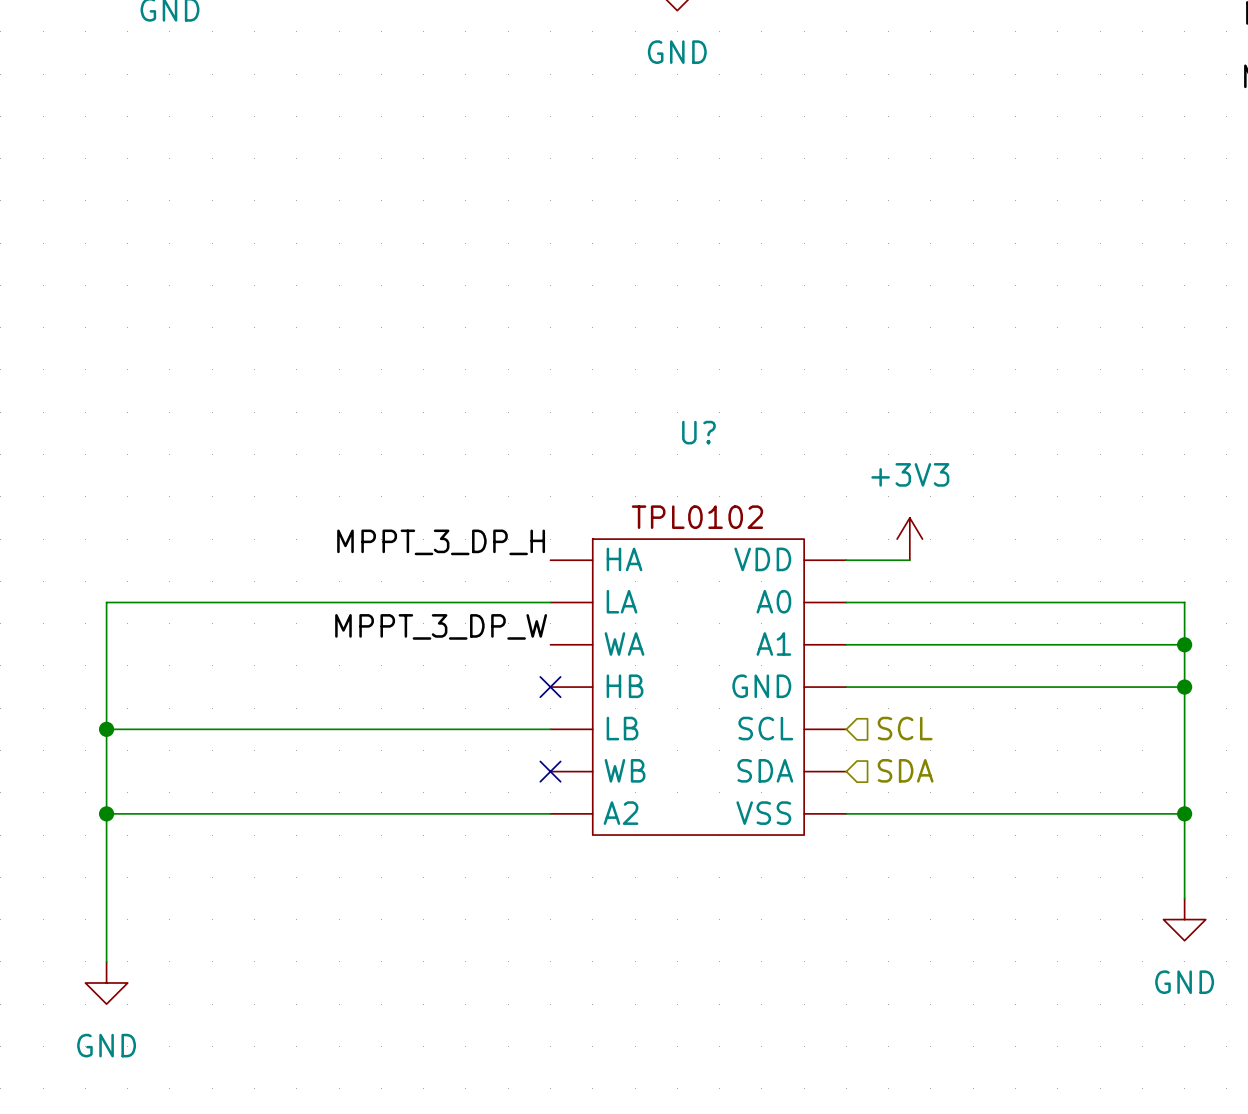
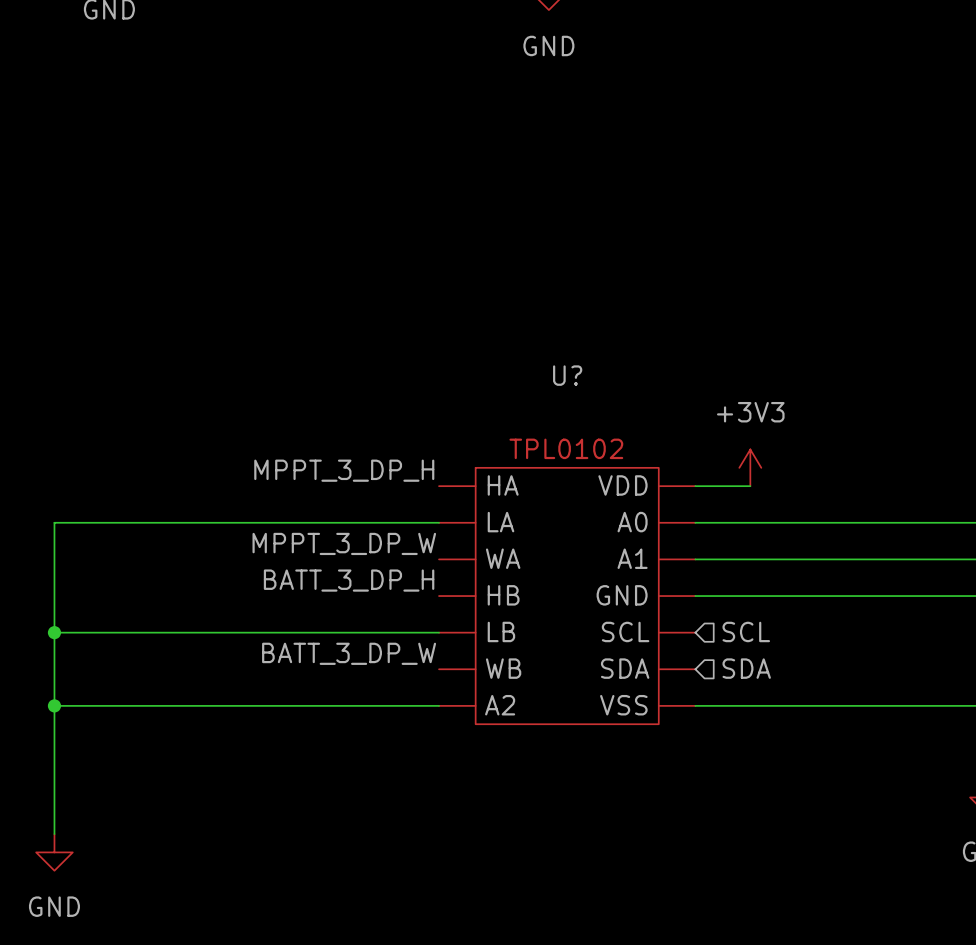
label: none -> BATT_3_DP_H (349, 580)
no-connect mark: (550, 687) -> none
label: none -> BATT_3_DP_W (349, 653)
no-connect mark: (550, 771) -> none

